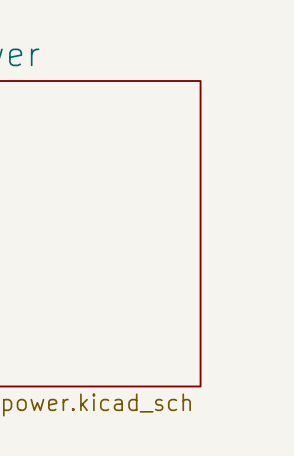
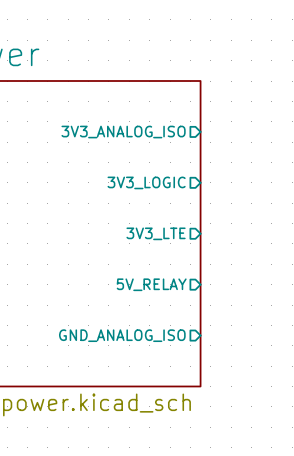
sheet pin: none -> 3V3_ANALOG_ISO (123, 132)
sheet pin: none -> 3V3_LOGIC (146, 182)
sheet pin: none -> 3V3_LTE (156, 233)
sheet pin: none -> 5V_RELAY (151, 284)
sheet pin: none -> GND_ANALOG_ISO (122, 335)

